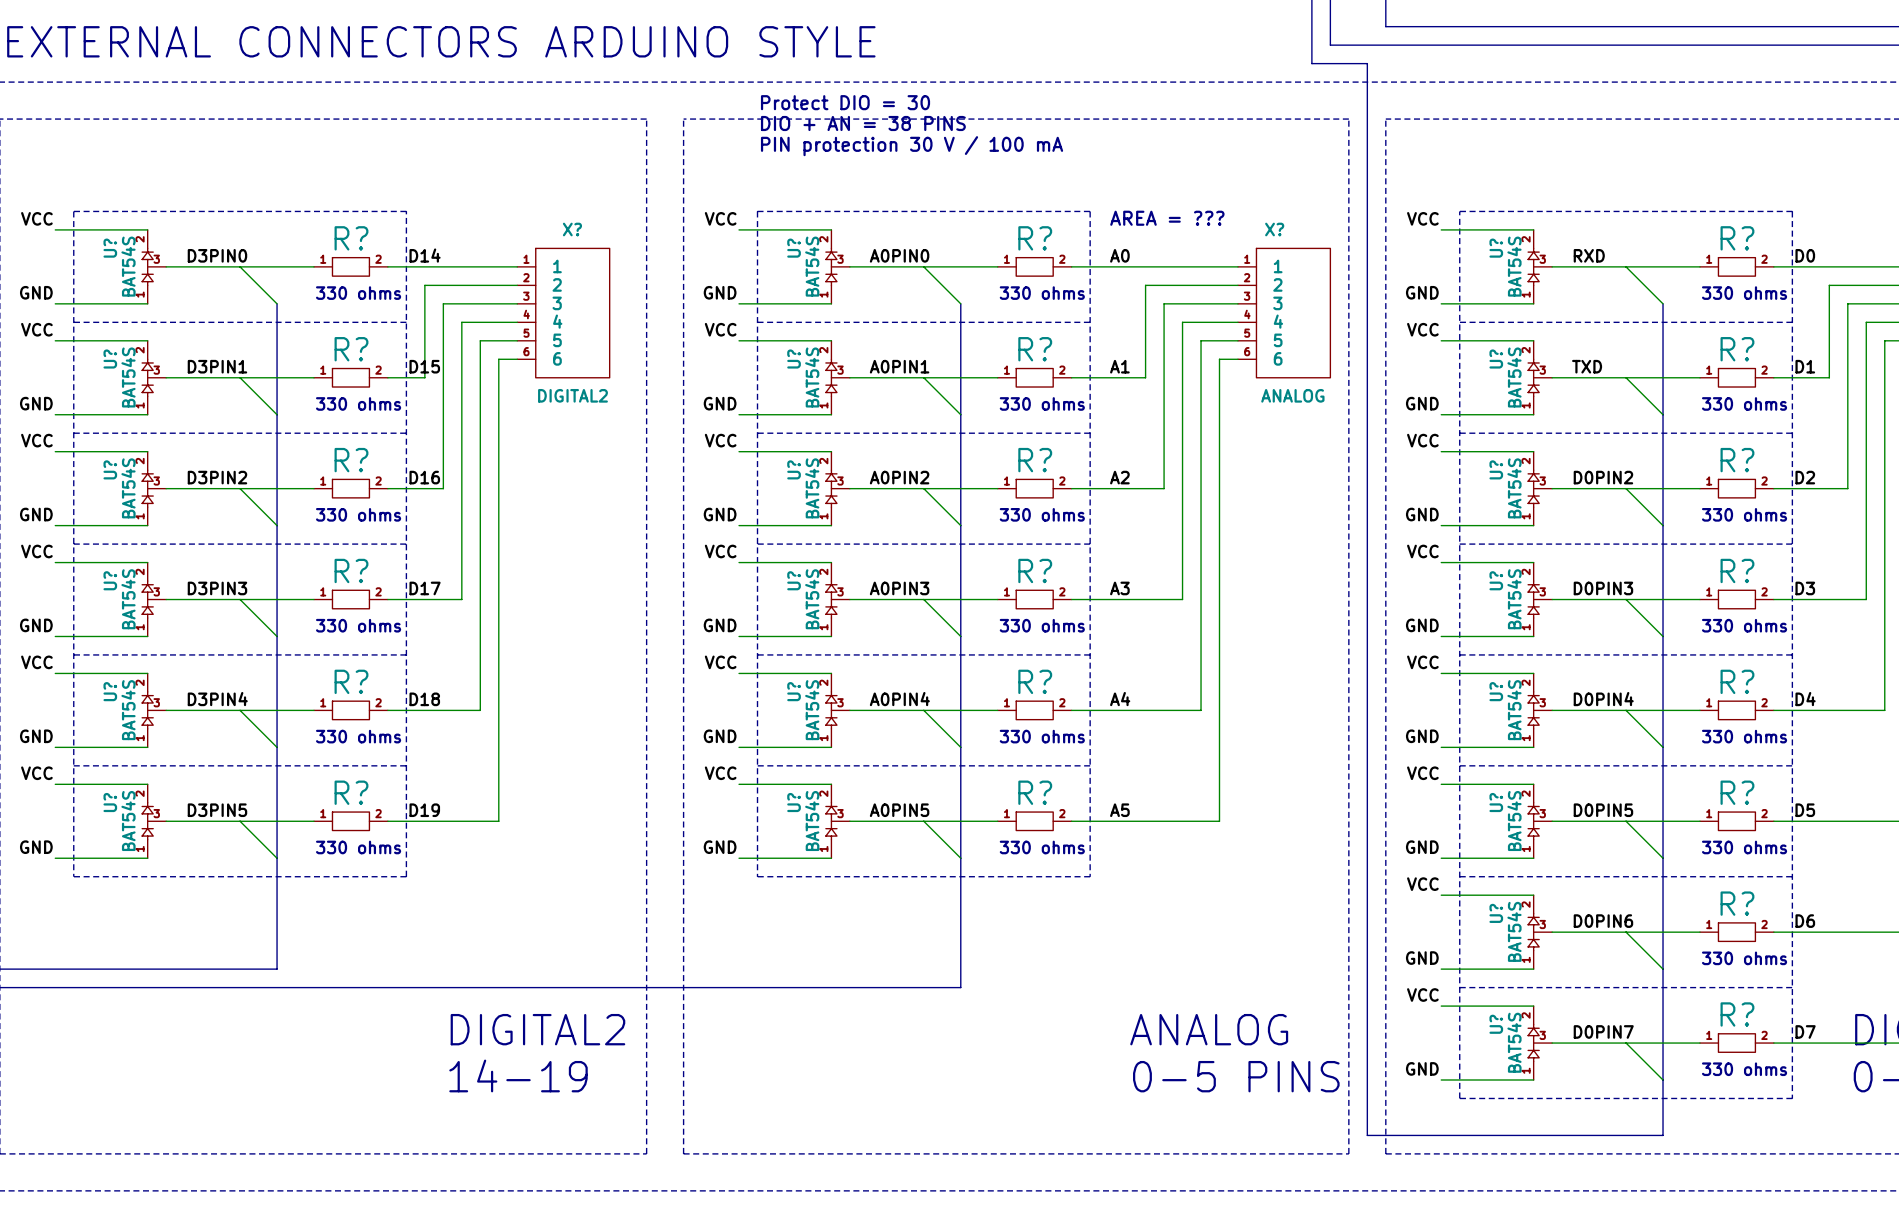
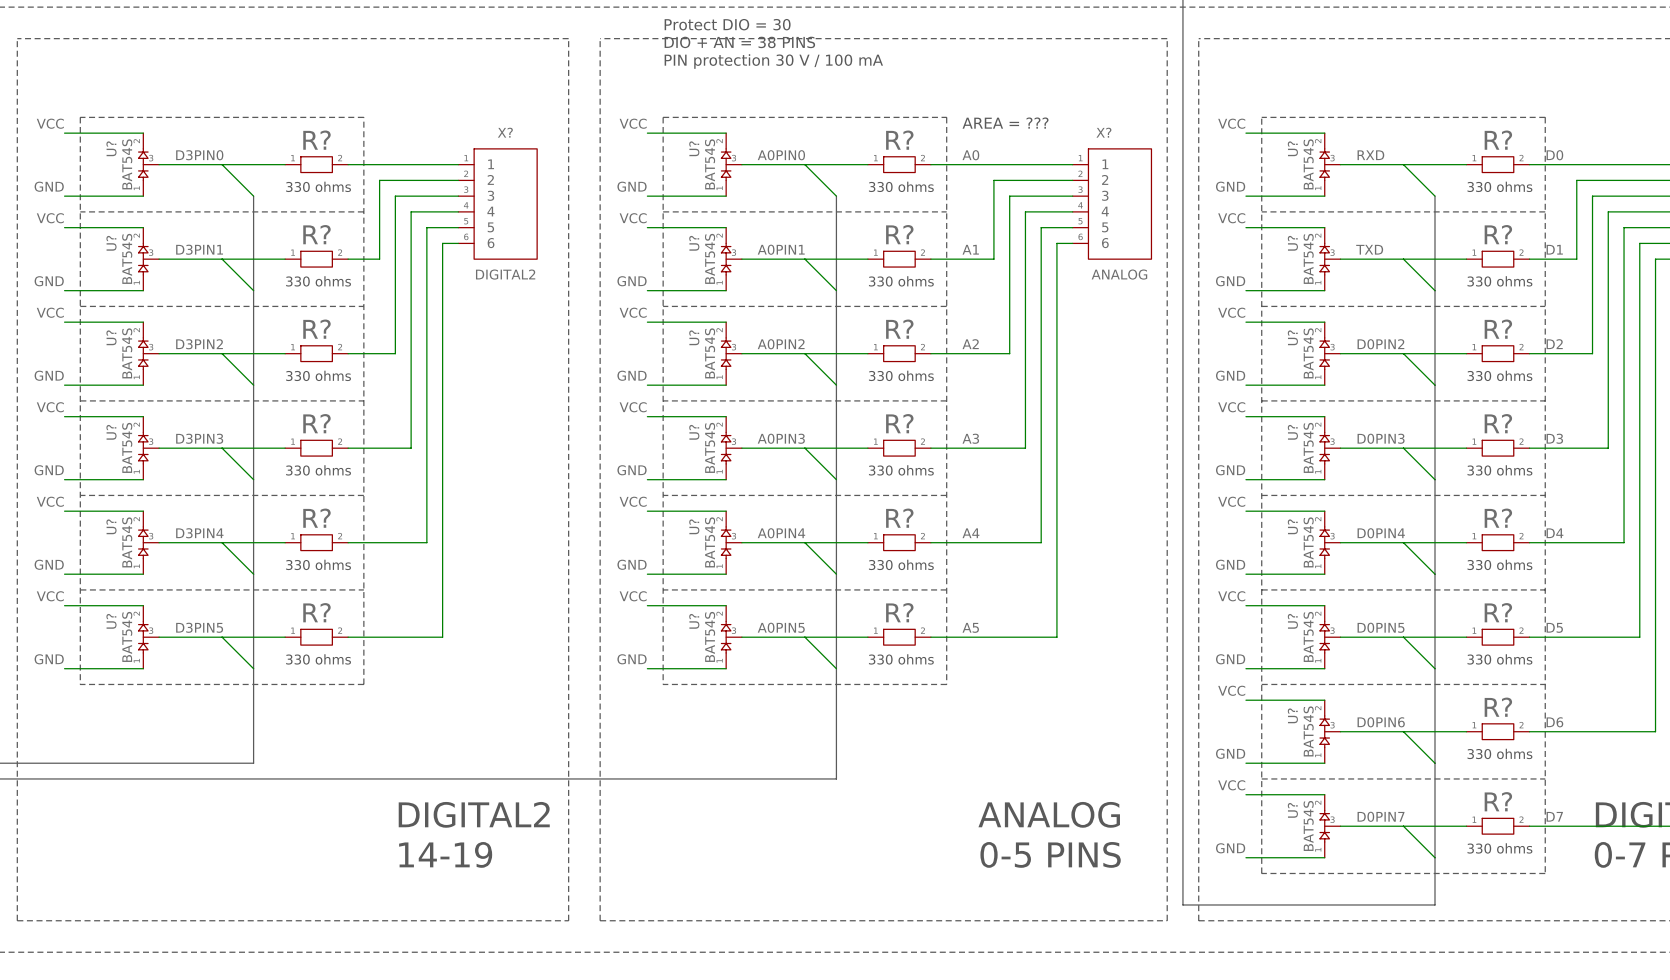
label: D14 (425, 255) -> none
label: D15 (424, 366) -> none
label: D16 (424, 477) -> none
label: D17 (425, 588) -> none
label: D18 (424, 699) -> none
label: D19 (424, 810) -> none

